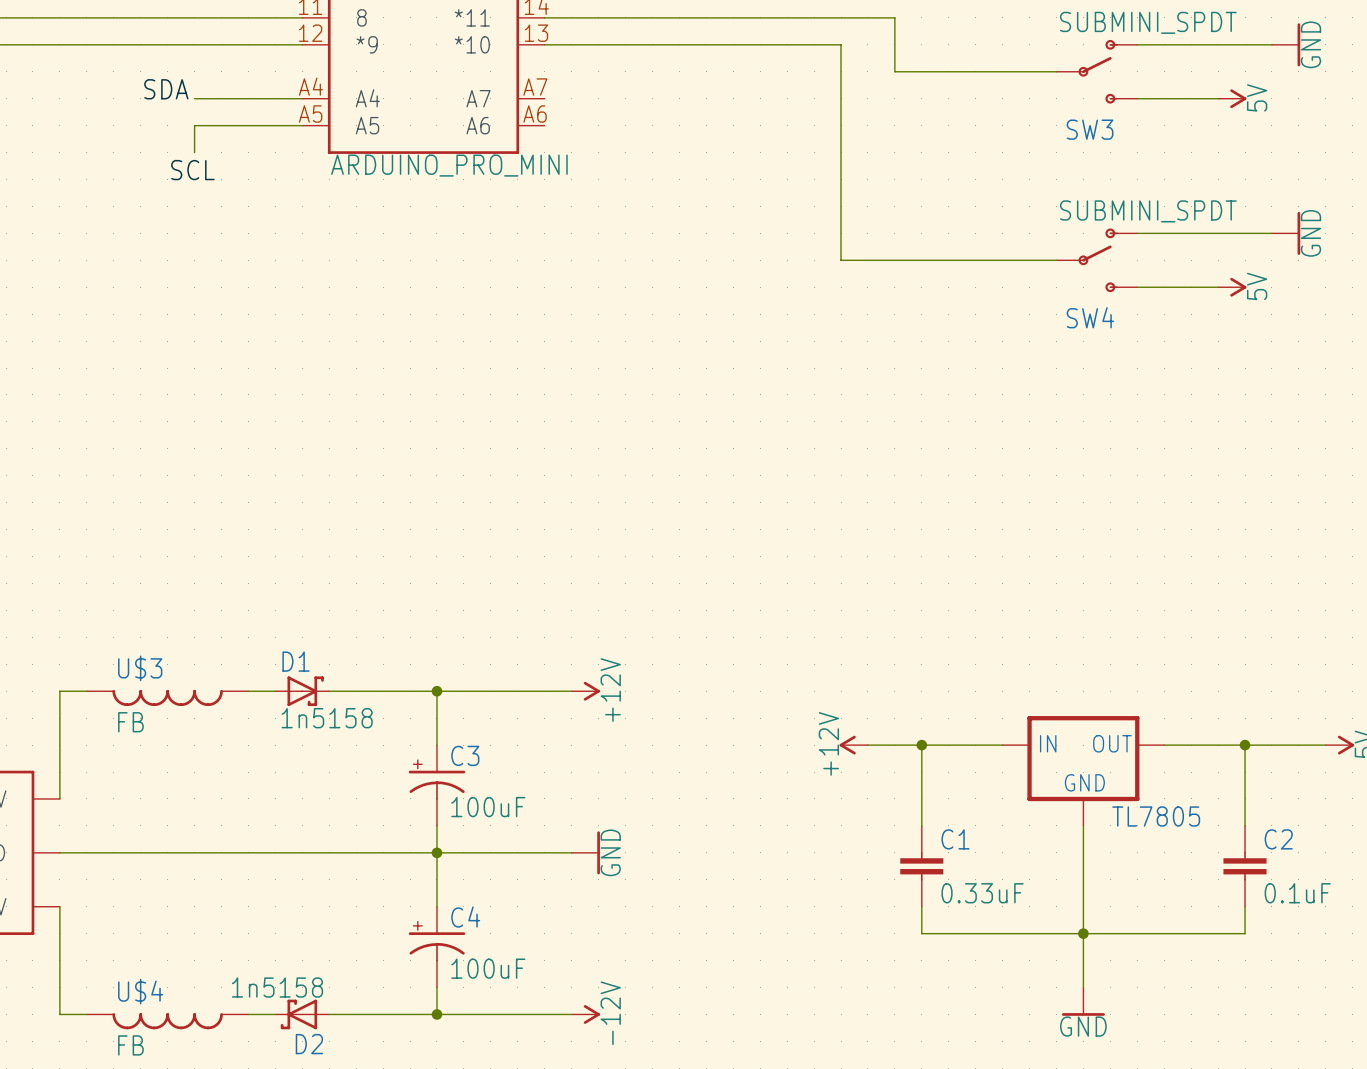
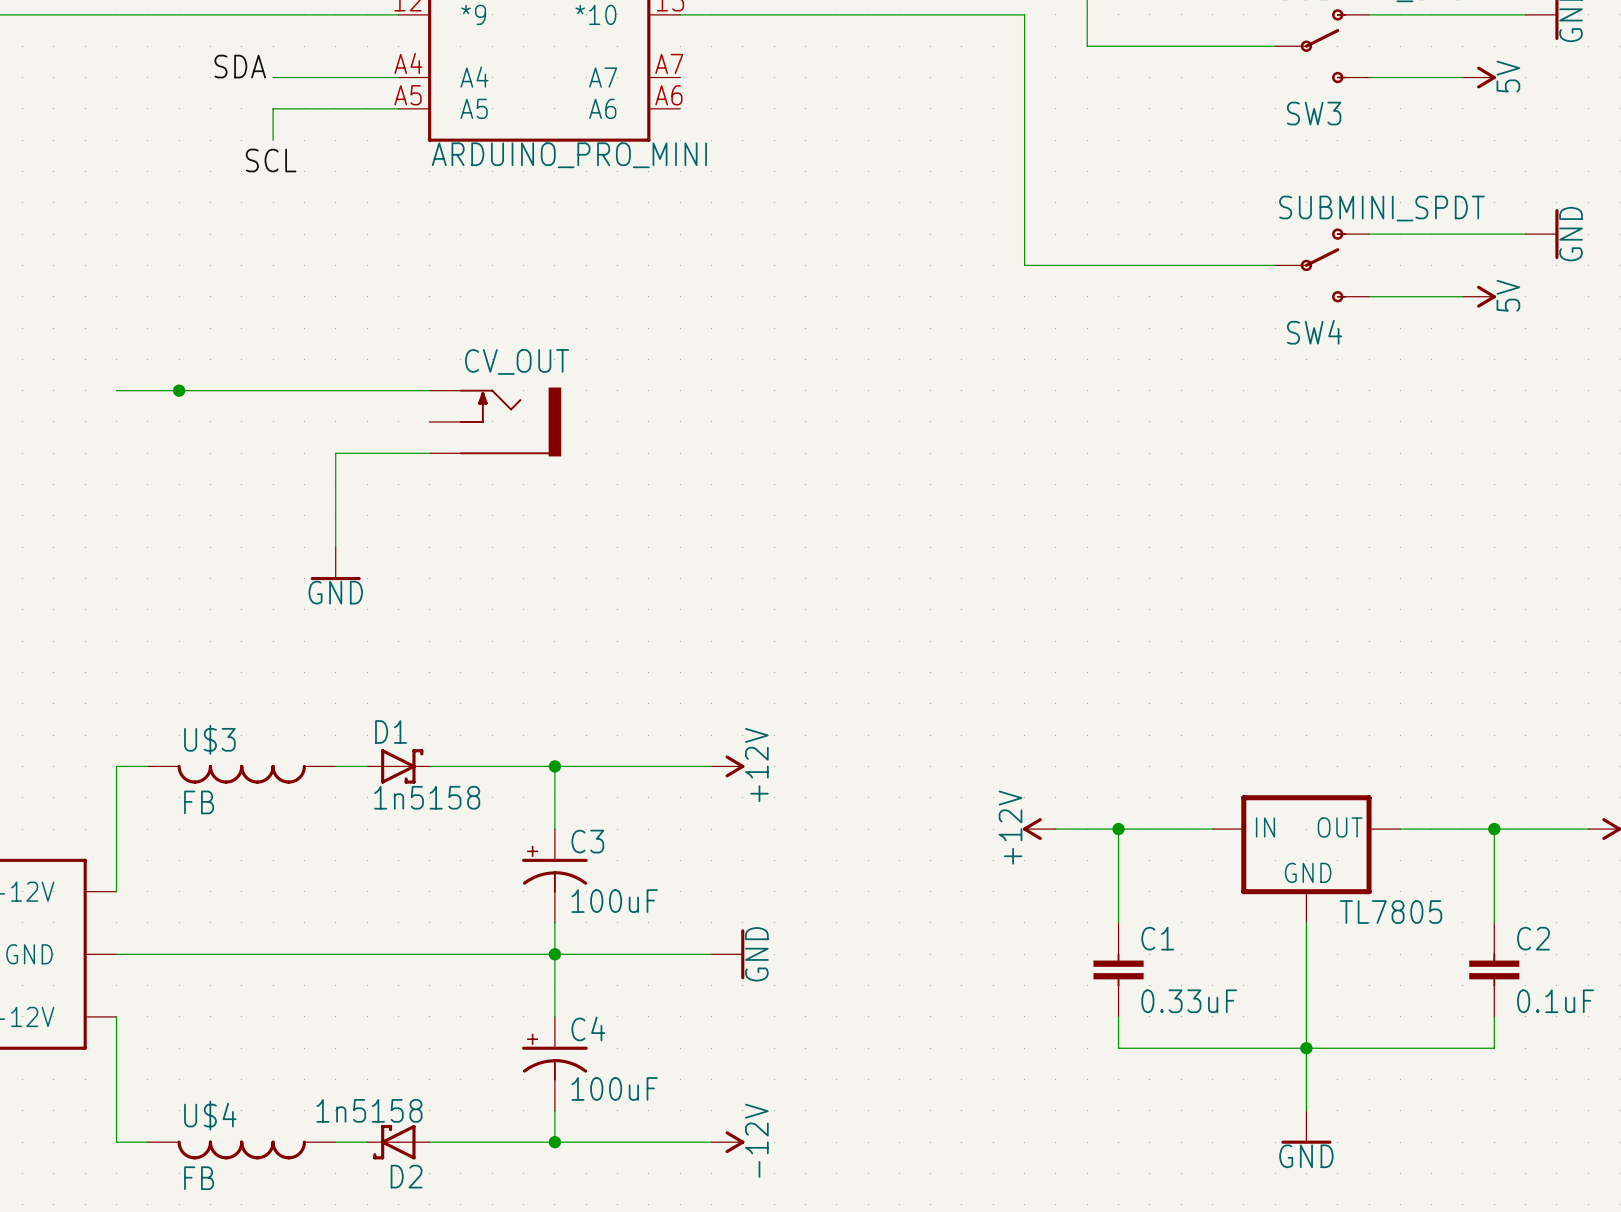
wire: none -> (116, 390) (429, 390)
junction: none -> (179, 390)
CV_OUT: none -> (495, 421)
wire: none -> (429, 453) (335, 453) (335, 547)
power symbol: none -> GND (335, 563)

